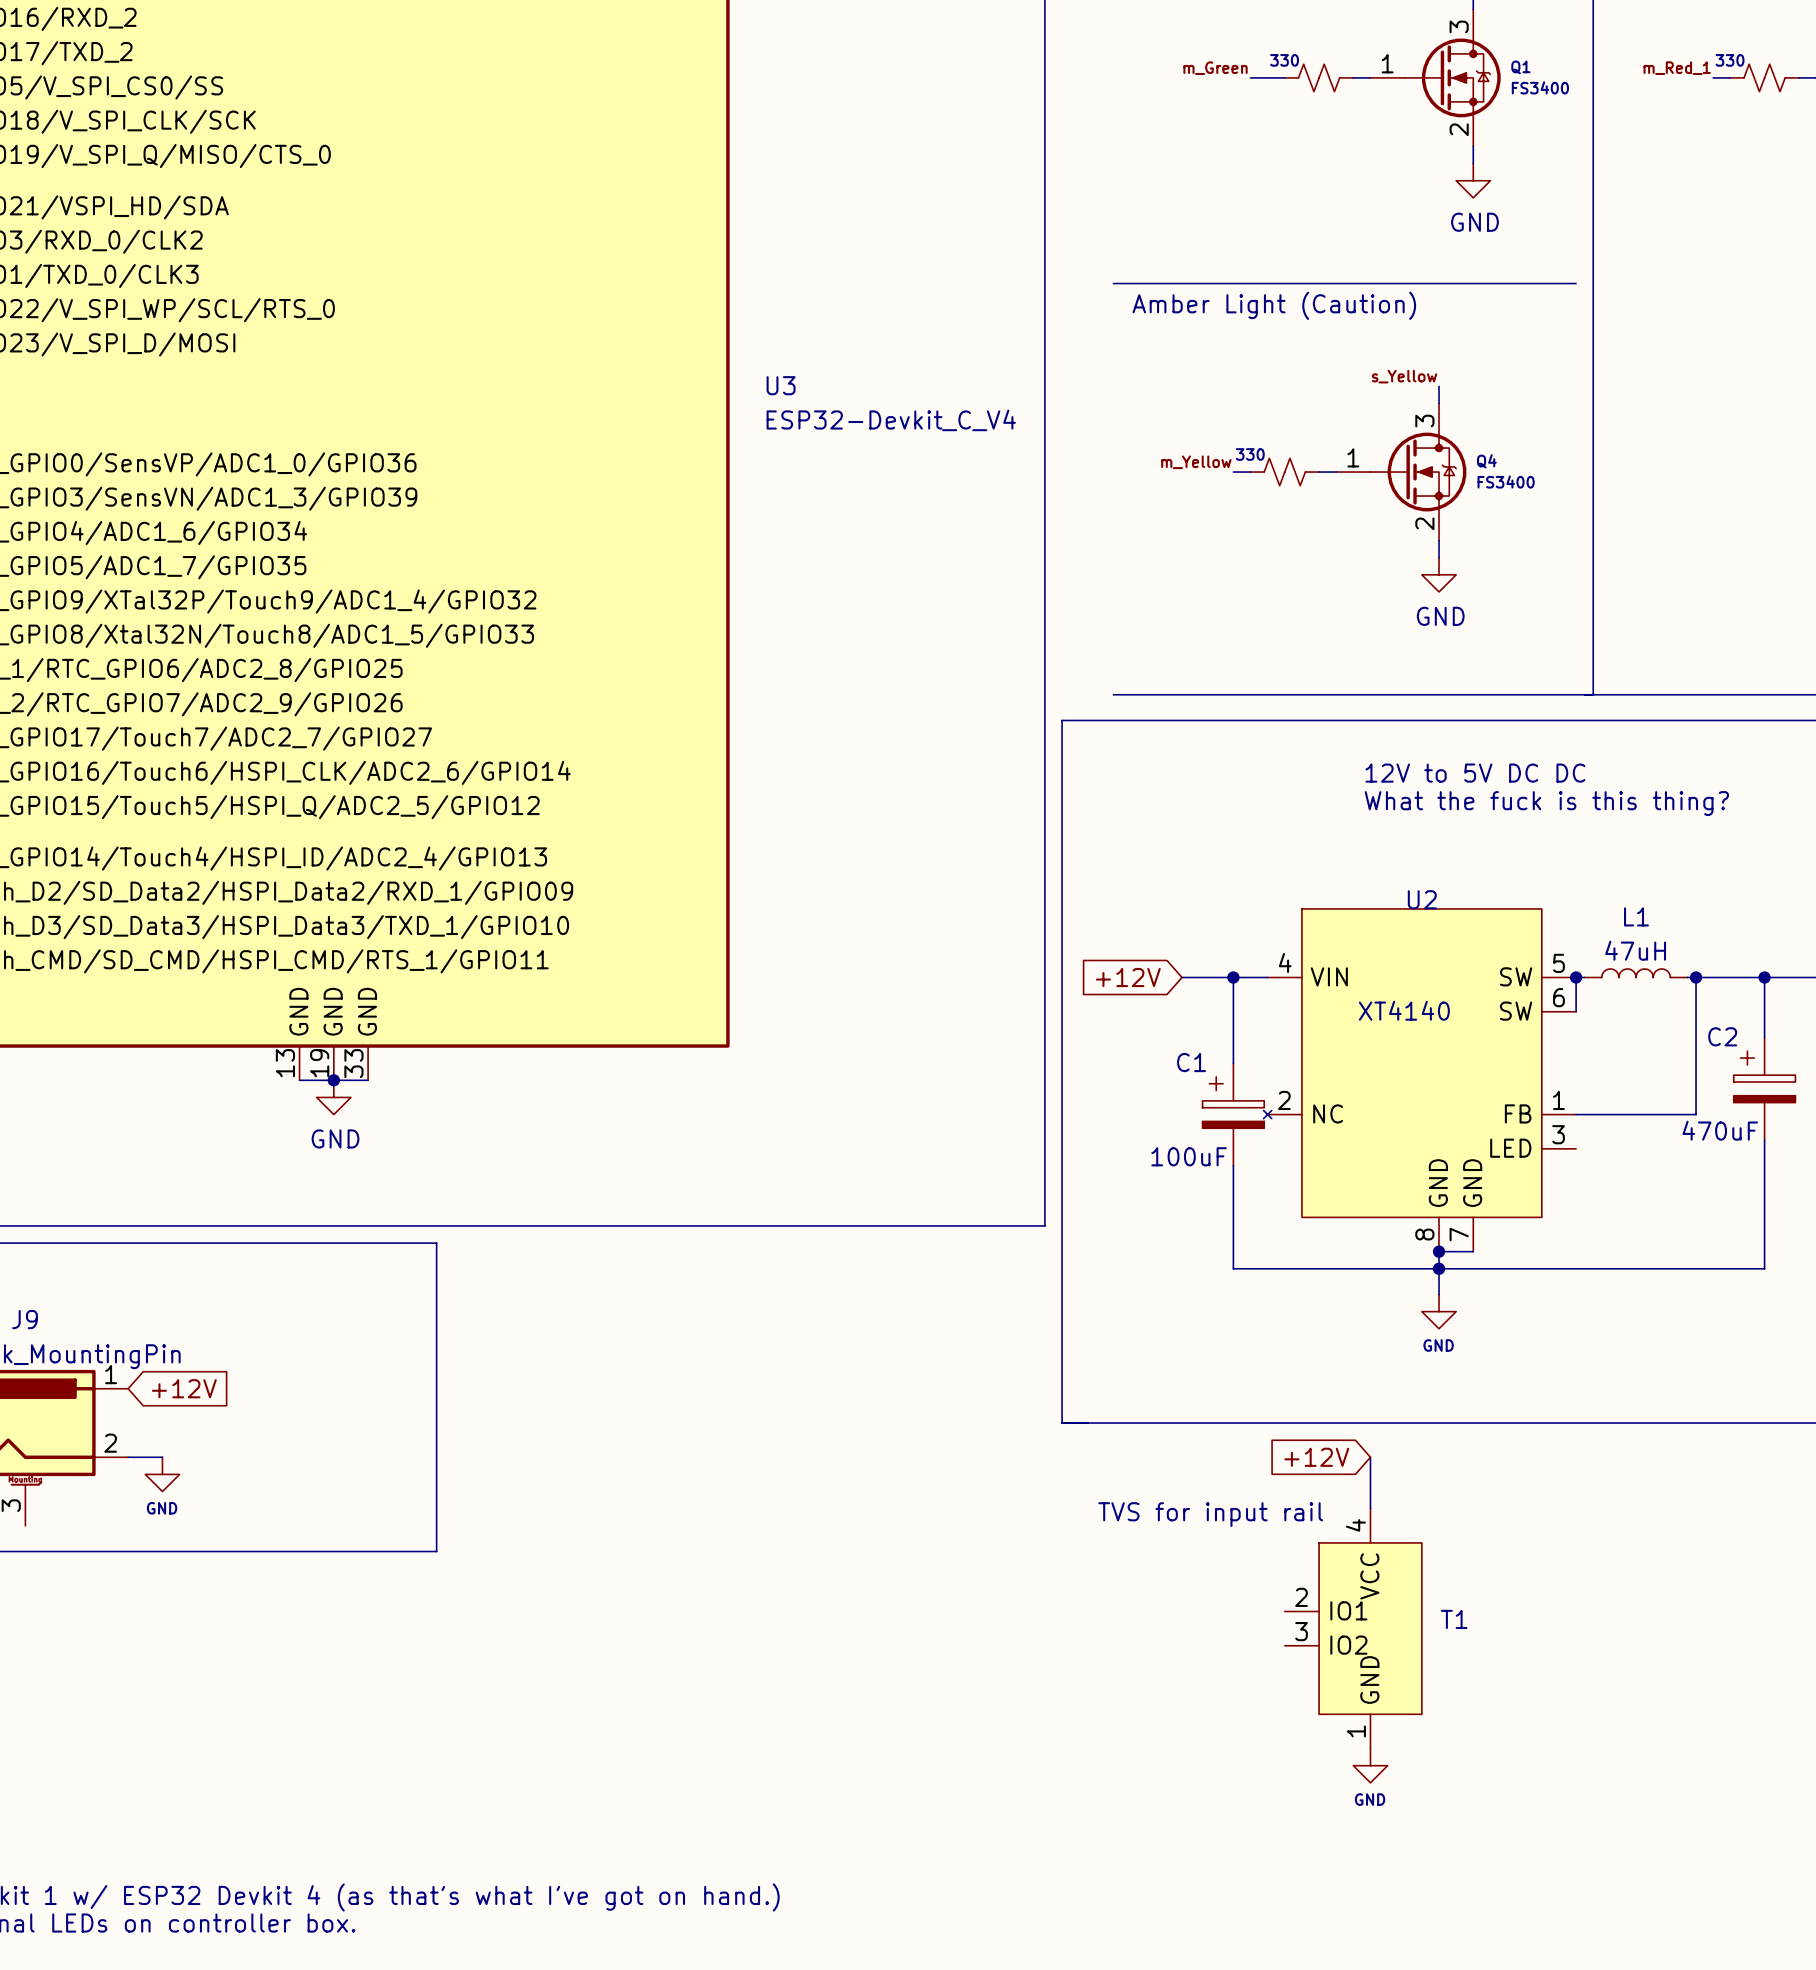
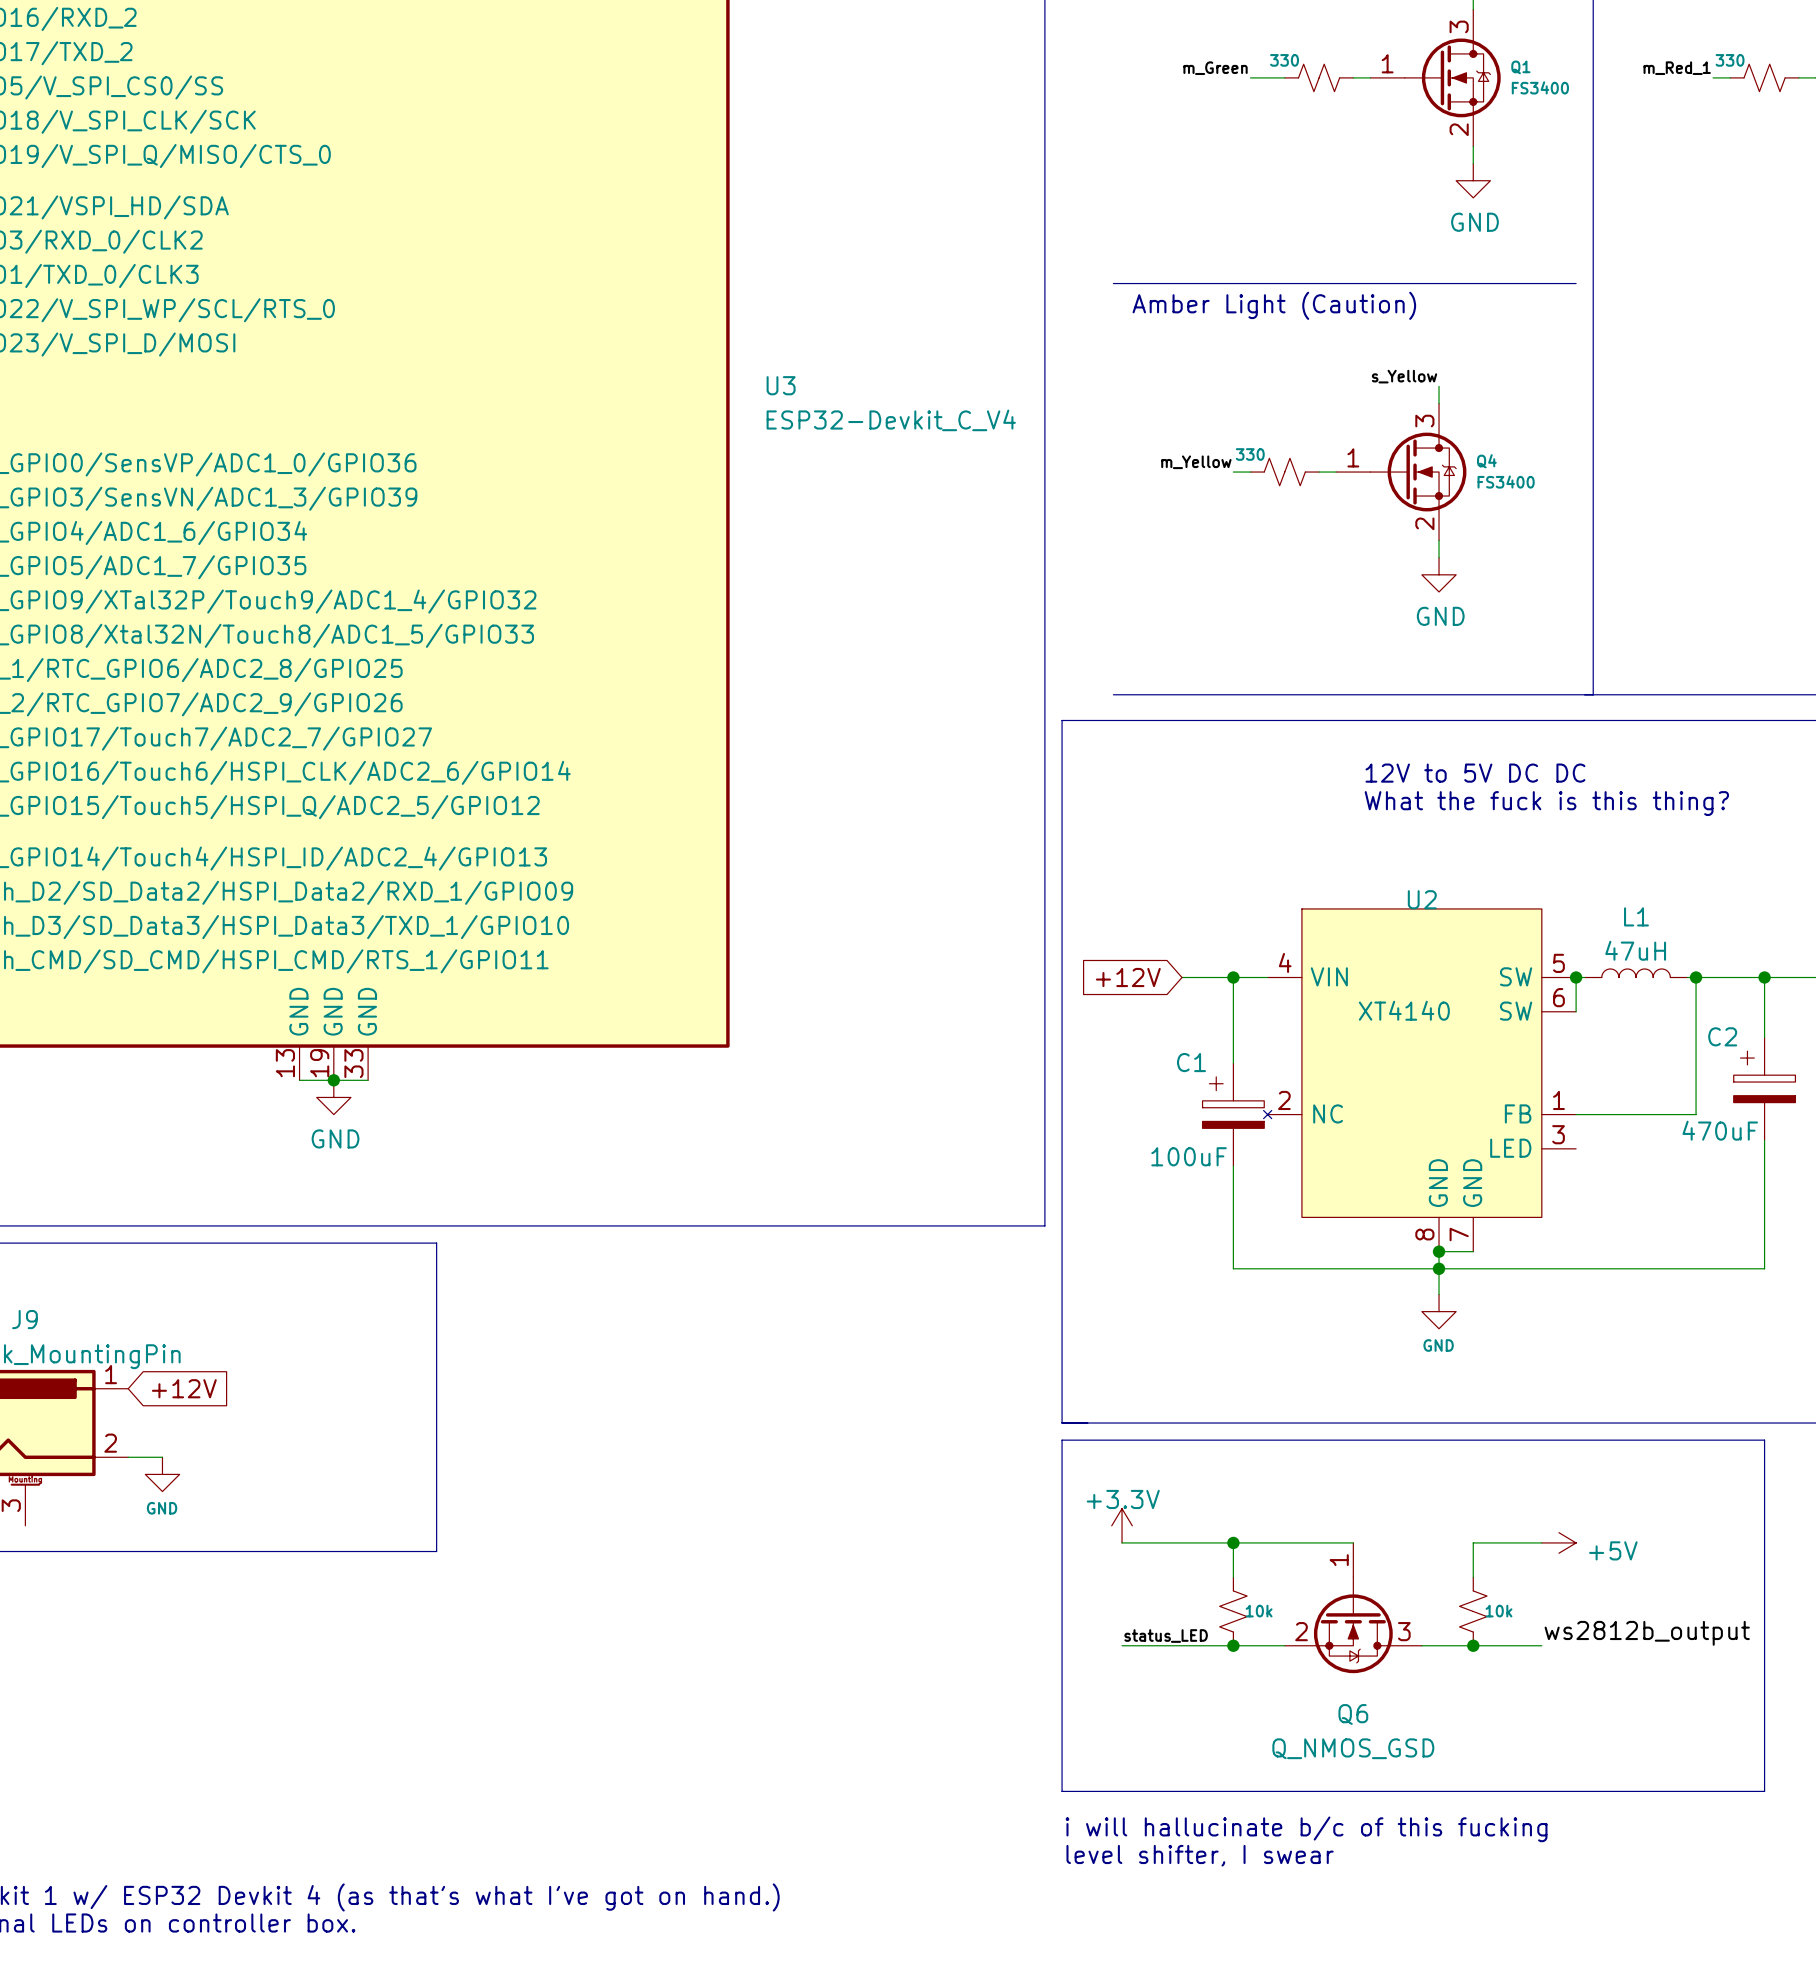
line: none -> (1062, 1440) (1764, 1440) (1764, 1791) (1062, 1791) (1062, 1440)
global label: +12V (1316, 1457) -> none
wire: (1370, 1457) (1370, 1508) -> none
text: TVS for input rail (1210, 1514) -> none
power symbol: none -> +3.3V (1122, 1525)
wire: none -> (1122, 1542) (1353, 1542)
wire: none -> (1233, 1542) (1233, 1577)
junction: none -> (1233, 1542)
wire: none -> (1541, 1542) (1473, 1542) (1473, 1577)
power symbol: none -> +5V (1558, 1542)
Q6: none -> Q_NMOS_GSD (1353, 1608)
part: none -> 10k (1233, 1611)
part: none -> 10k (1473, 1611)
T1: (1353, 1628) -> none
label: none -> ws2812b_output (1647, 1633)
label: none -> status_LED (1166, 1636)
wire: none -> (1122, 1645) (1284, 1645)
junction: none -> (1233, 1645)
wire: none -> (1421, 1645) (1541, 1645)
junction: none -> (1473, 1645)
power symbol: GND (1370, 1765) -> none
text: none -> i will hallucinate b/c of this fucking (1306, 1829)
text: none -> level shifter, I swear (1200, 1855)

